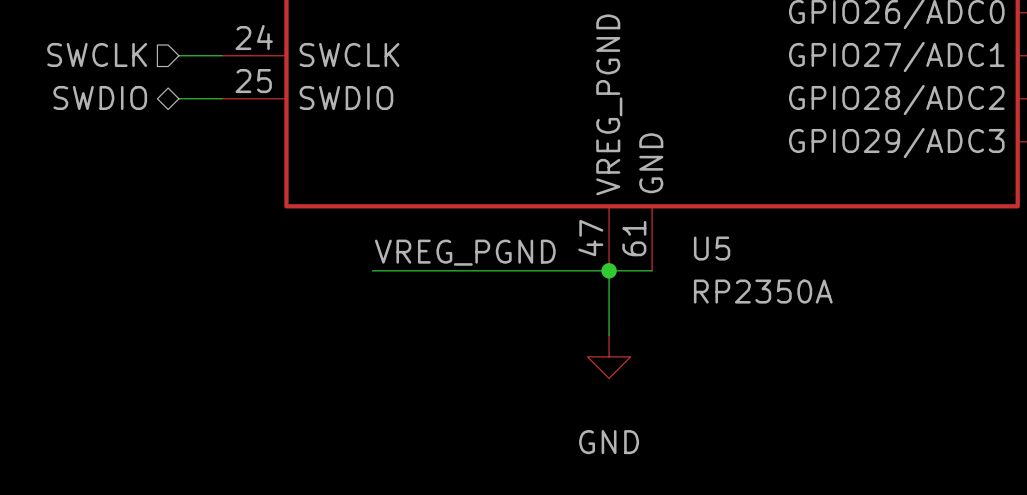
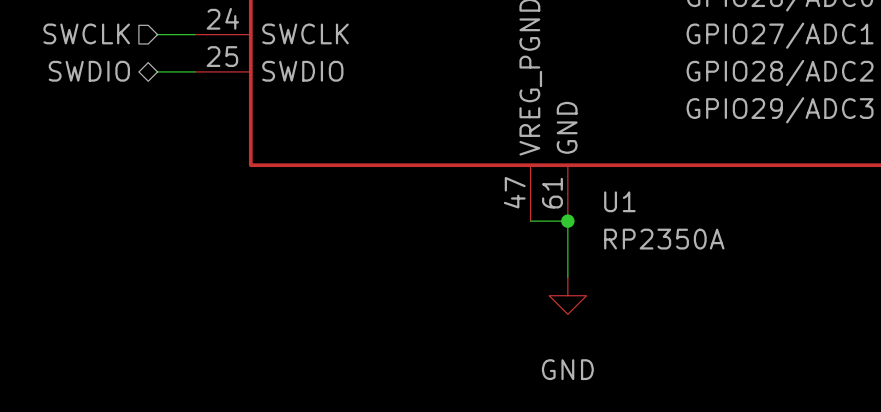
U5 name: U5 (712, 248) -> U1 (619, 201)
label: VREG_PGND (465, 252) -> none
wire: (372, 270) (609, 270) (609, 335) -> none
junction position: (609, 270) -> (567, 221)
wire: none -> (567, 221) (567, 277)
power symbol position: GND (609, 356) -> GND (567, 295)

